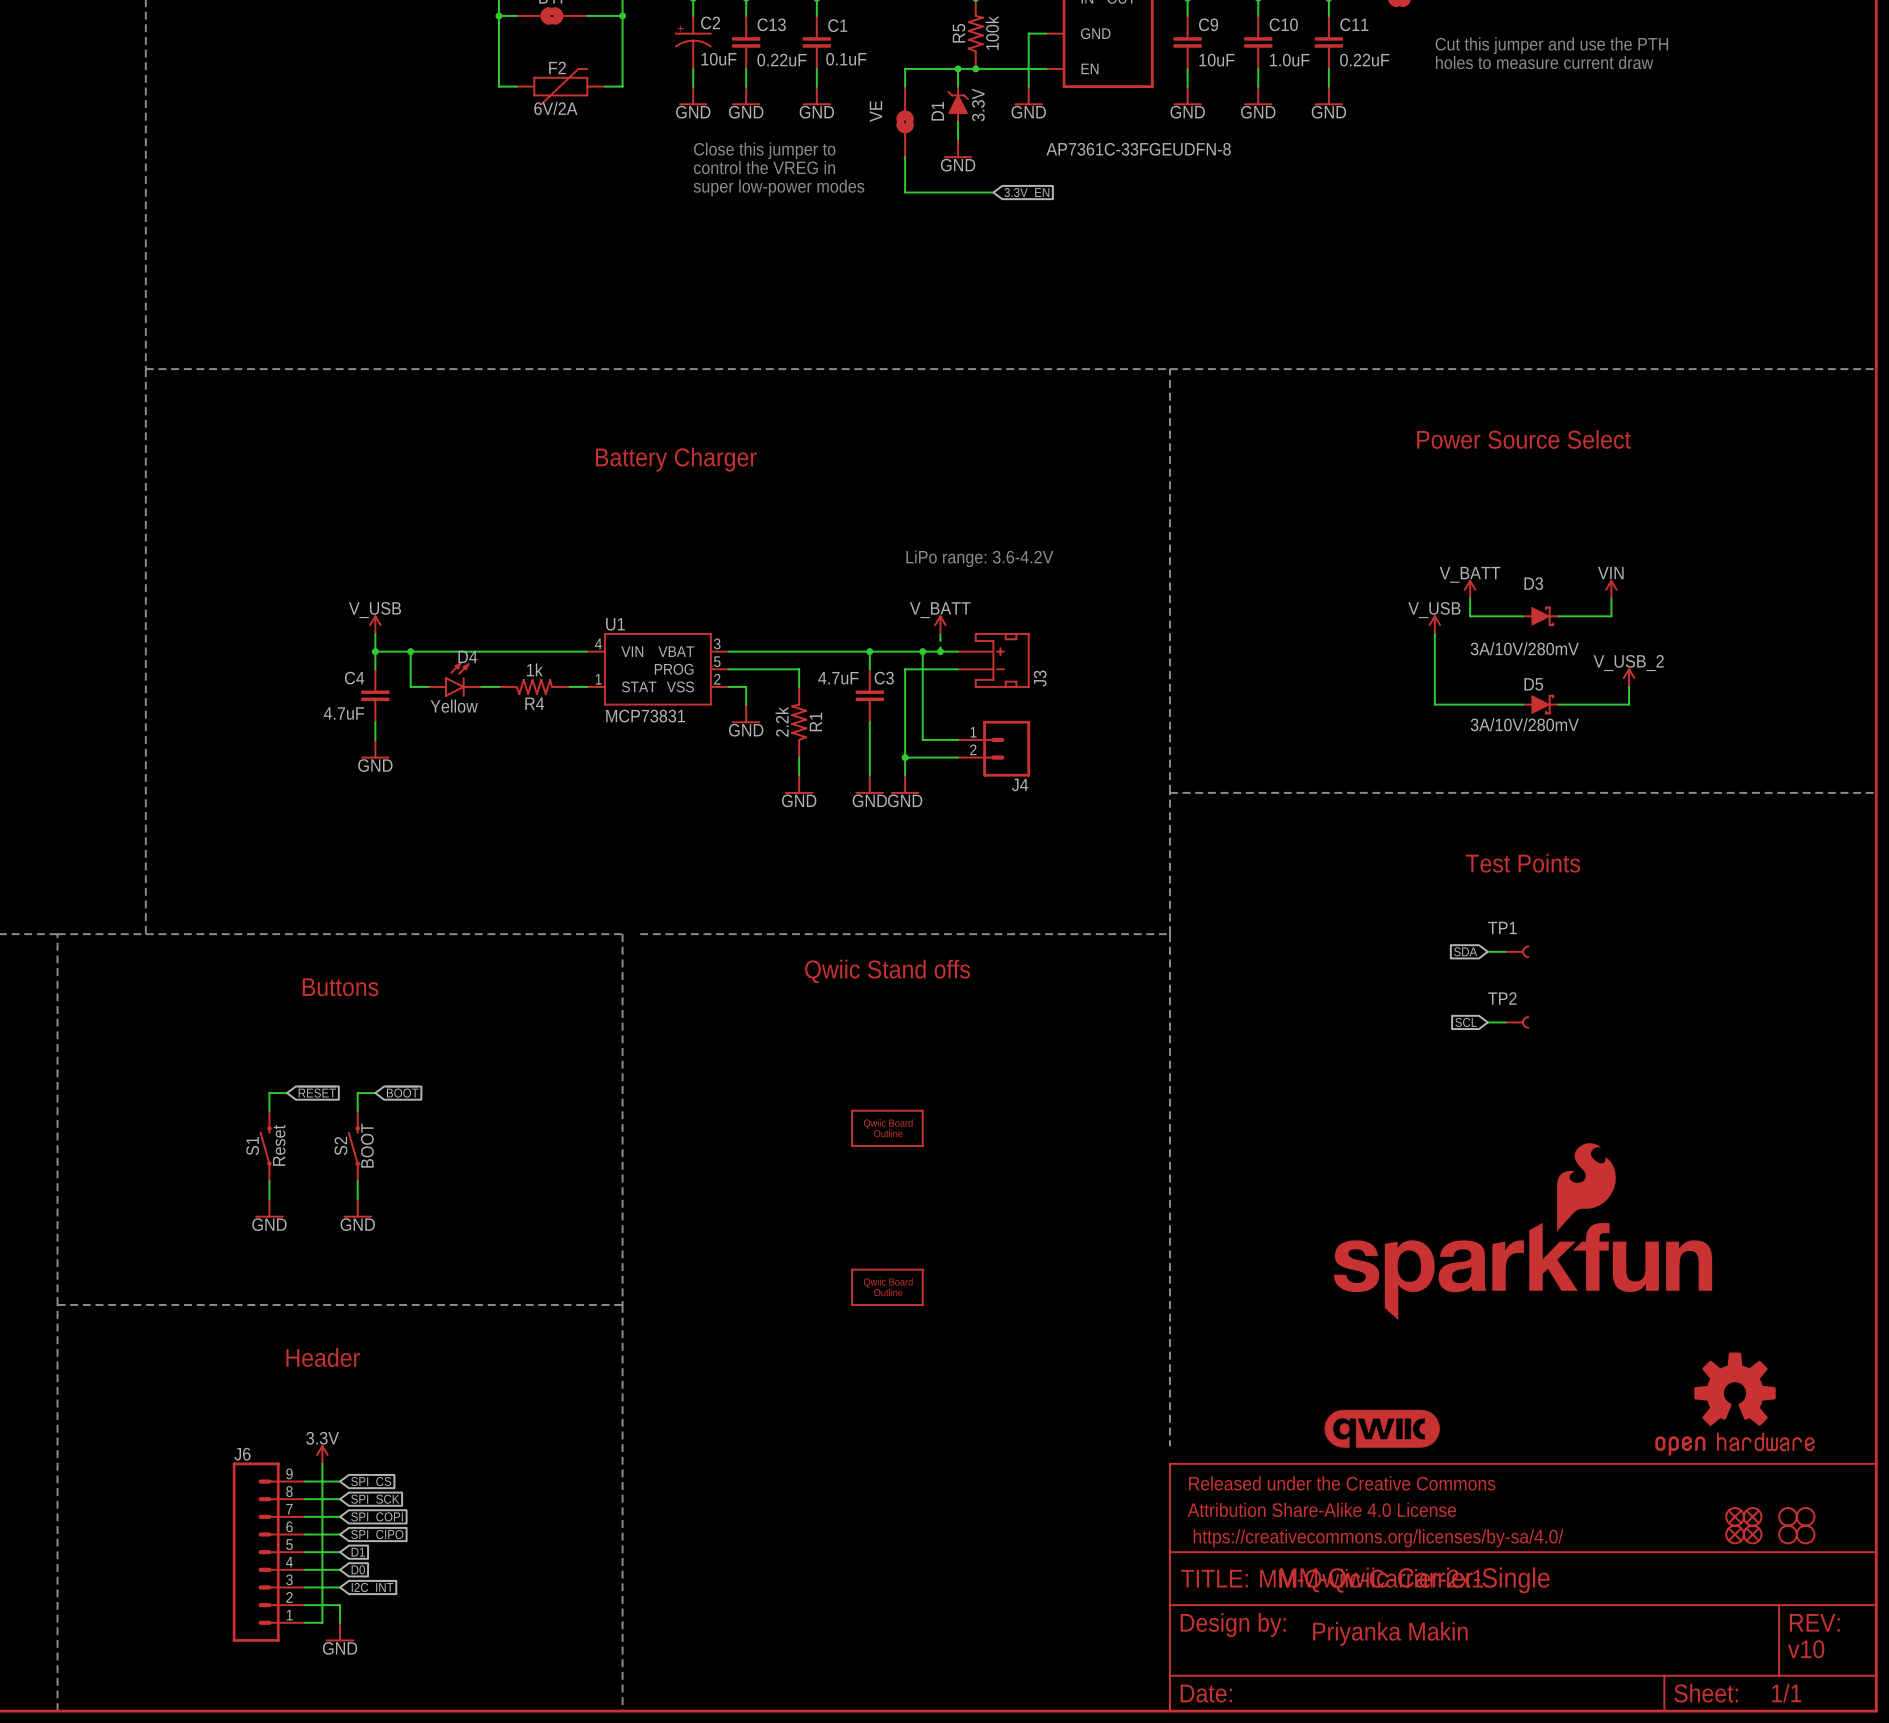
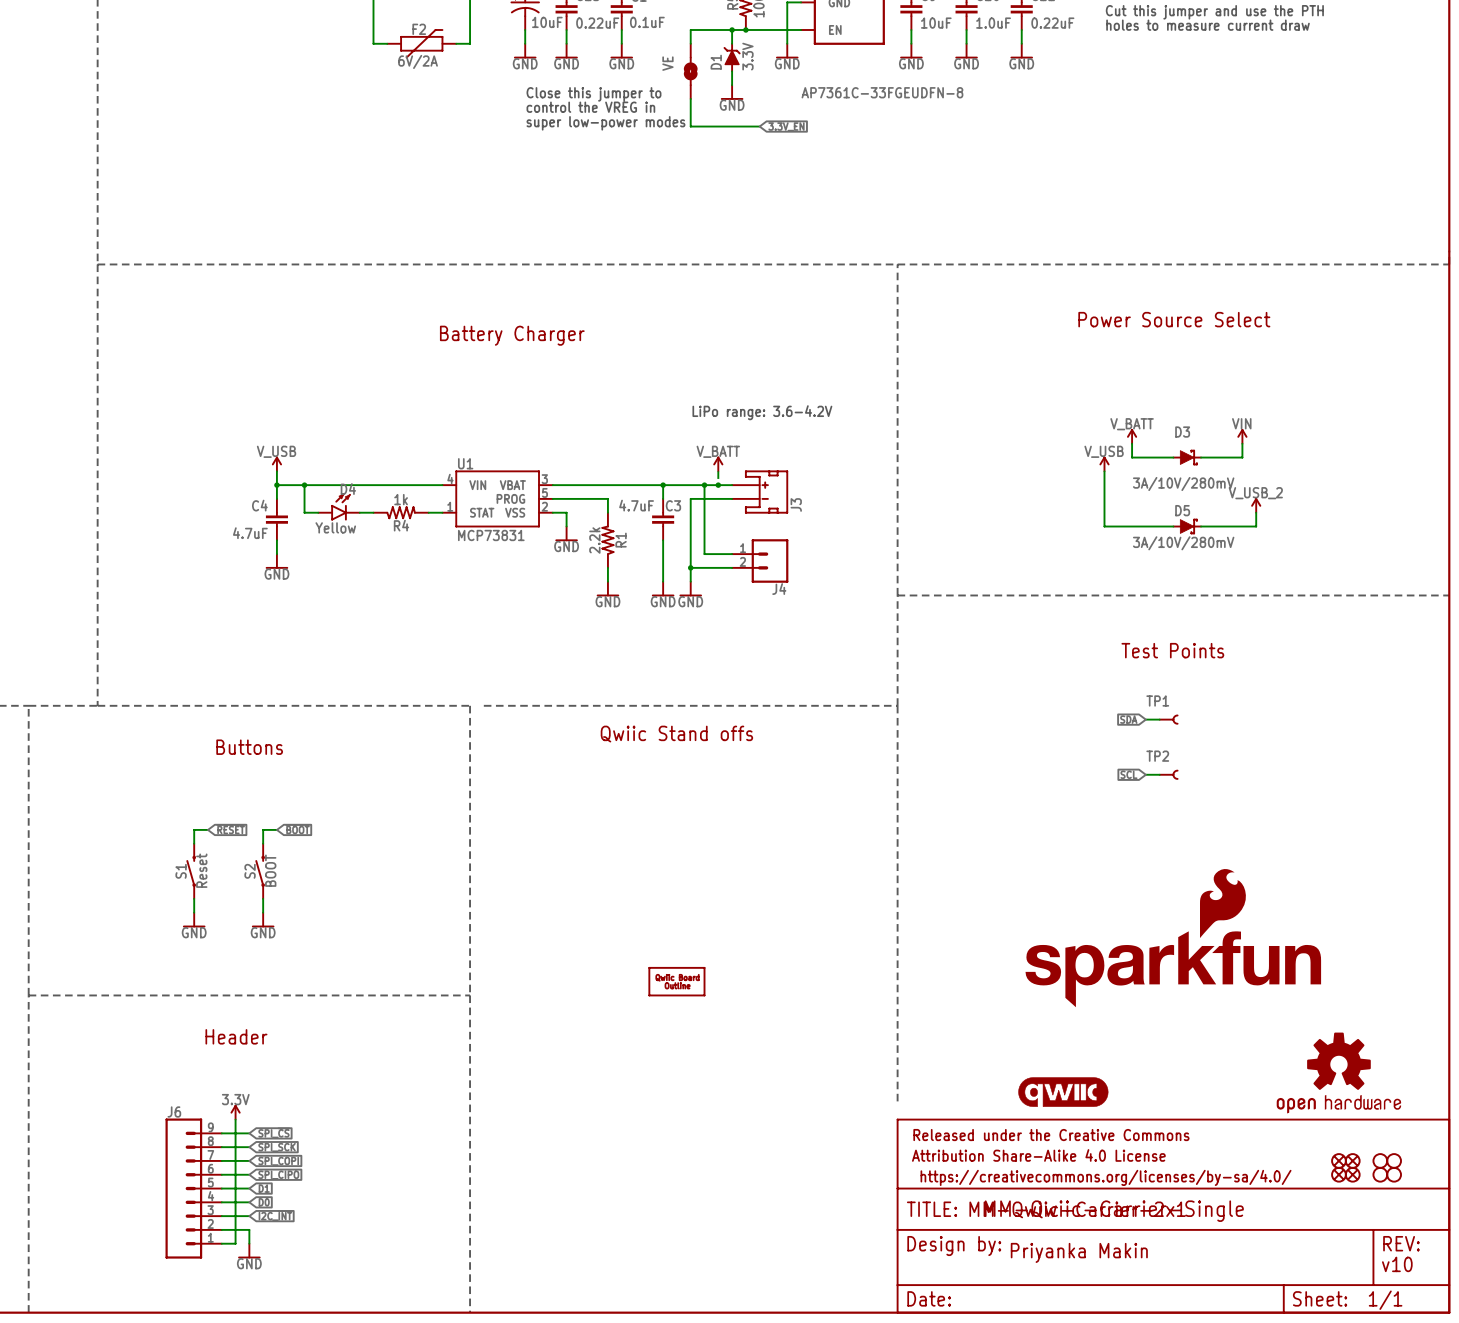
part: (887, 1128) -> none

